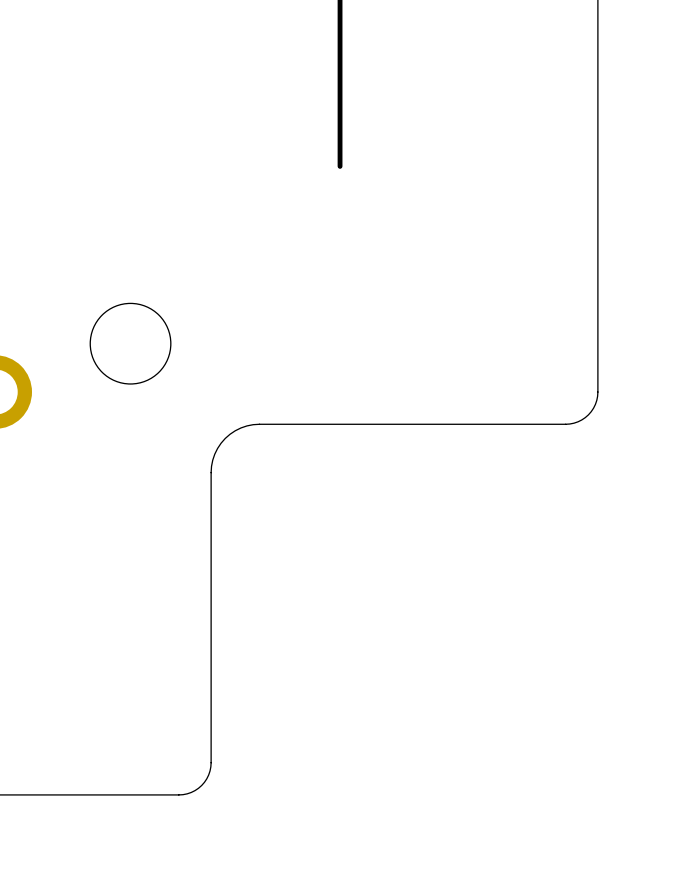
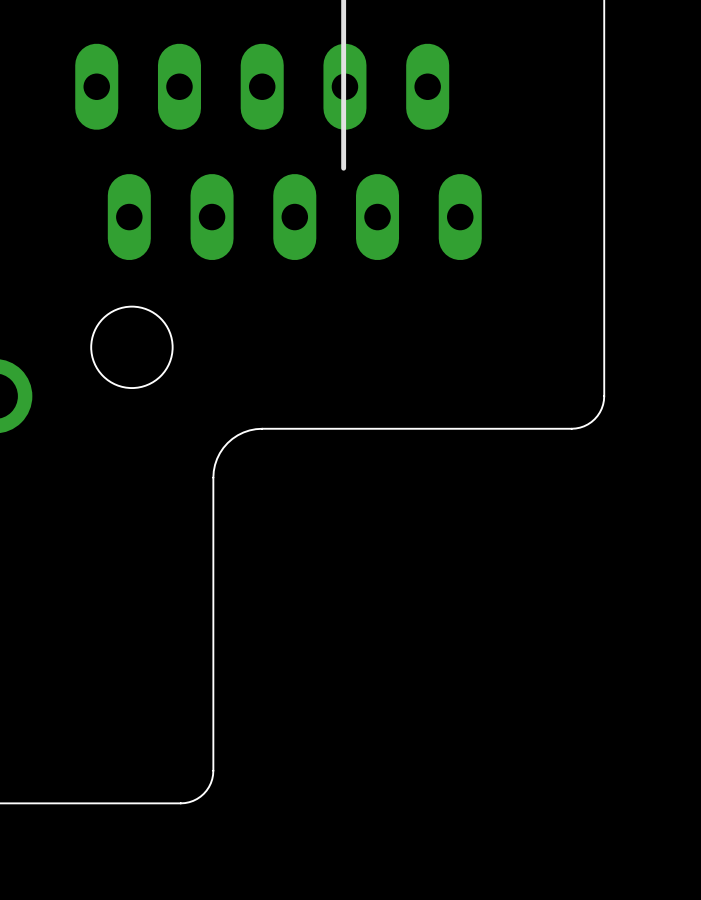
part: none -> (262, 86)
part: none -> (294, 217)

